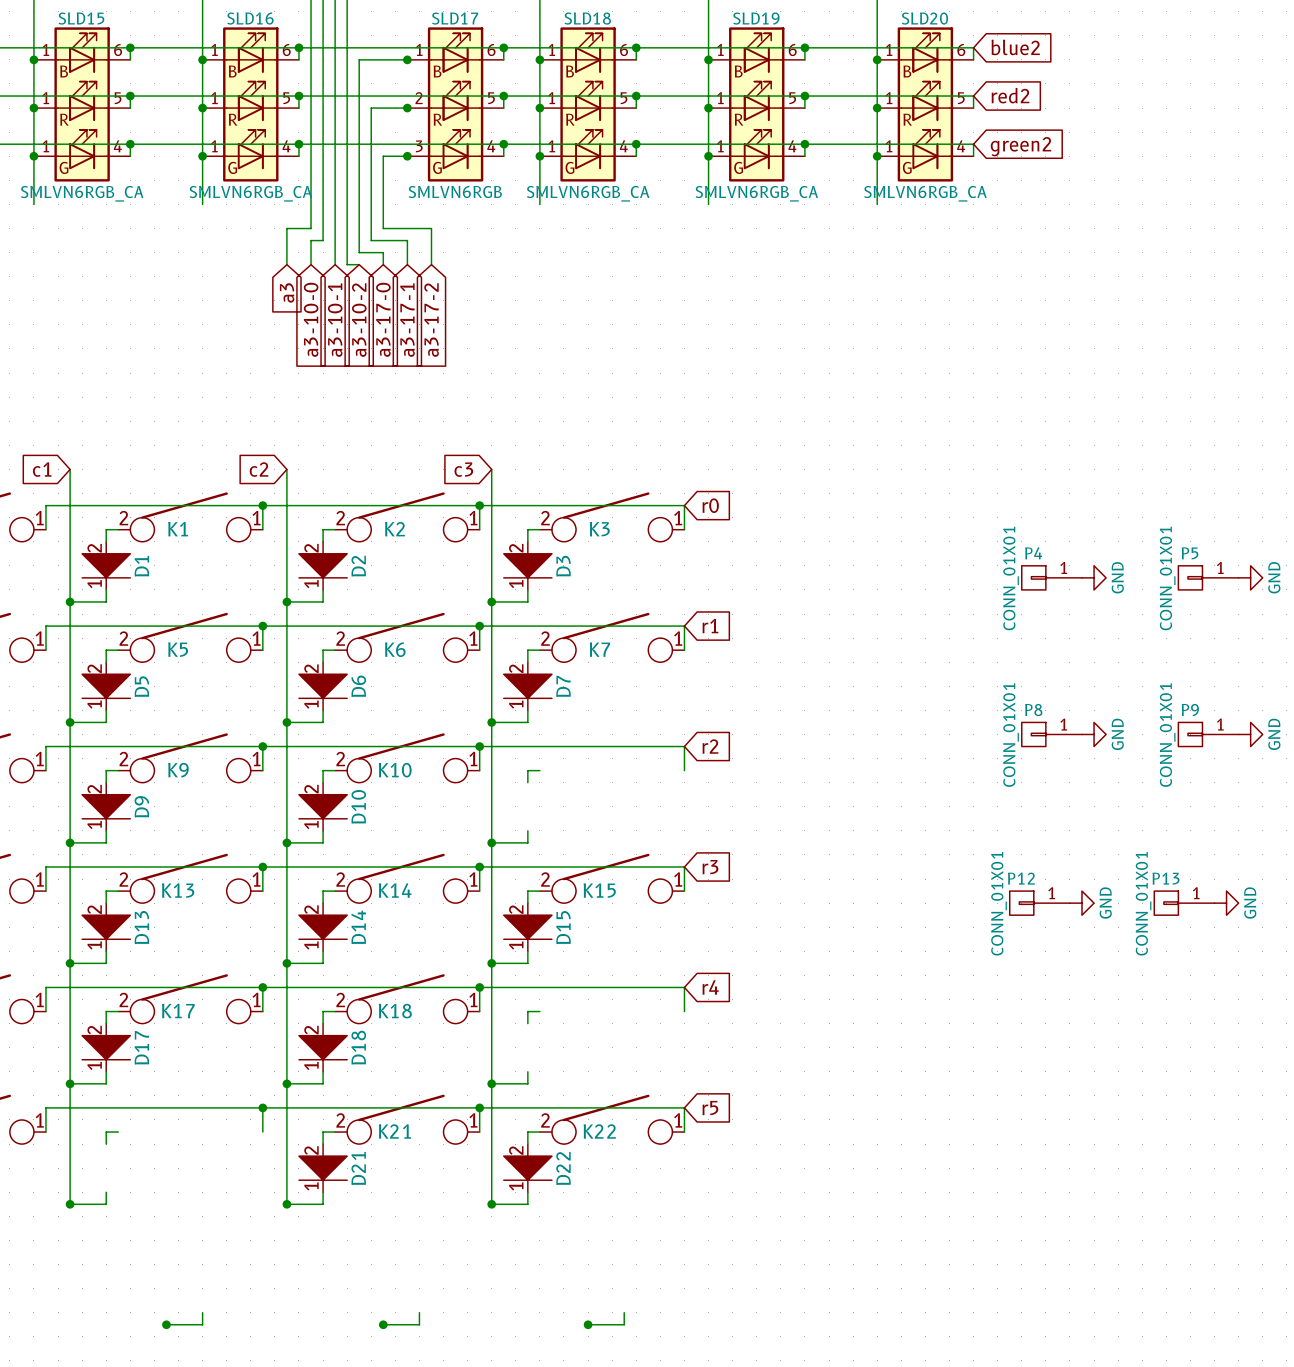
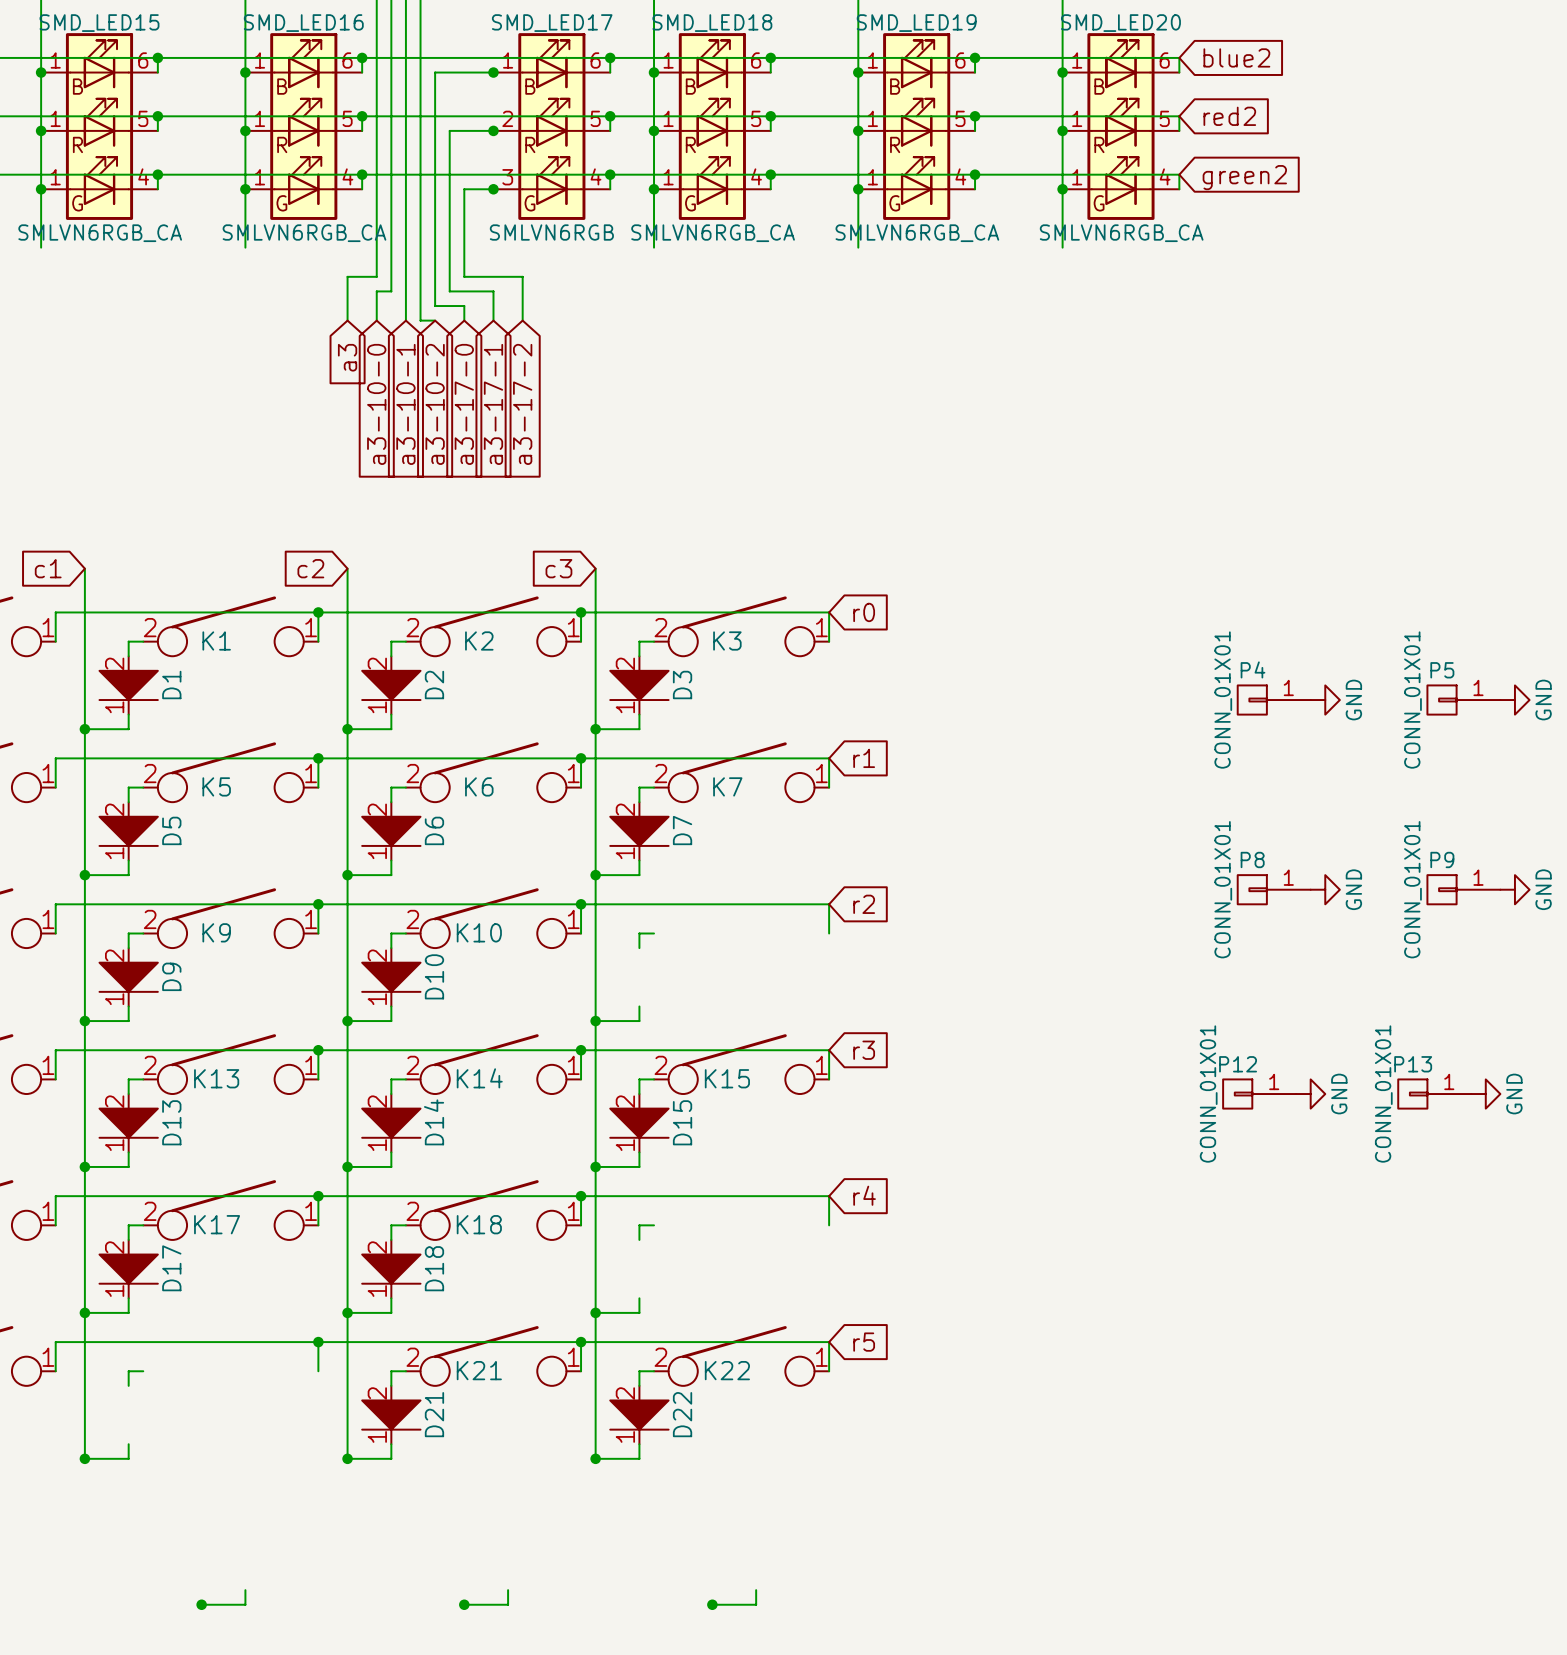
SLD15 name: SLD15 (81, 18) -> SMD_LED15 (99, 23)
SLD16 name: SLD16 (250, 18) -> SMD_LED16 (303, 23)
SLD17 name: SLD17 (455, 18) -> SMD_LED17 (552, 23)
SLD18 name: SLD18 (587, 18) -> SMD_LED18 (712, 23)
SLD19 name: SLD19 (756, 18) -> SMD_LED19 (916, 23)
SLD20 name: SLD20 (924, 18) -> SMD_LED20 (1120, 23)

